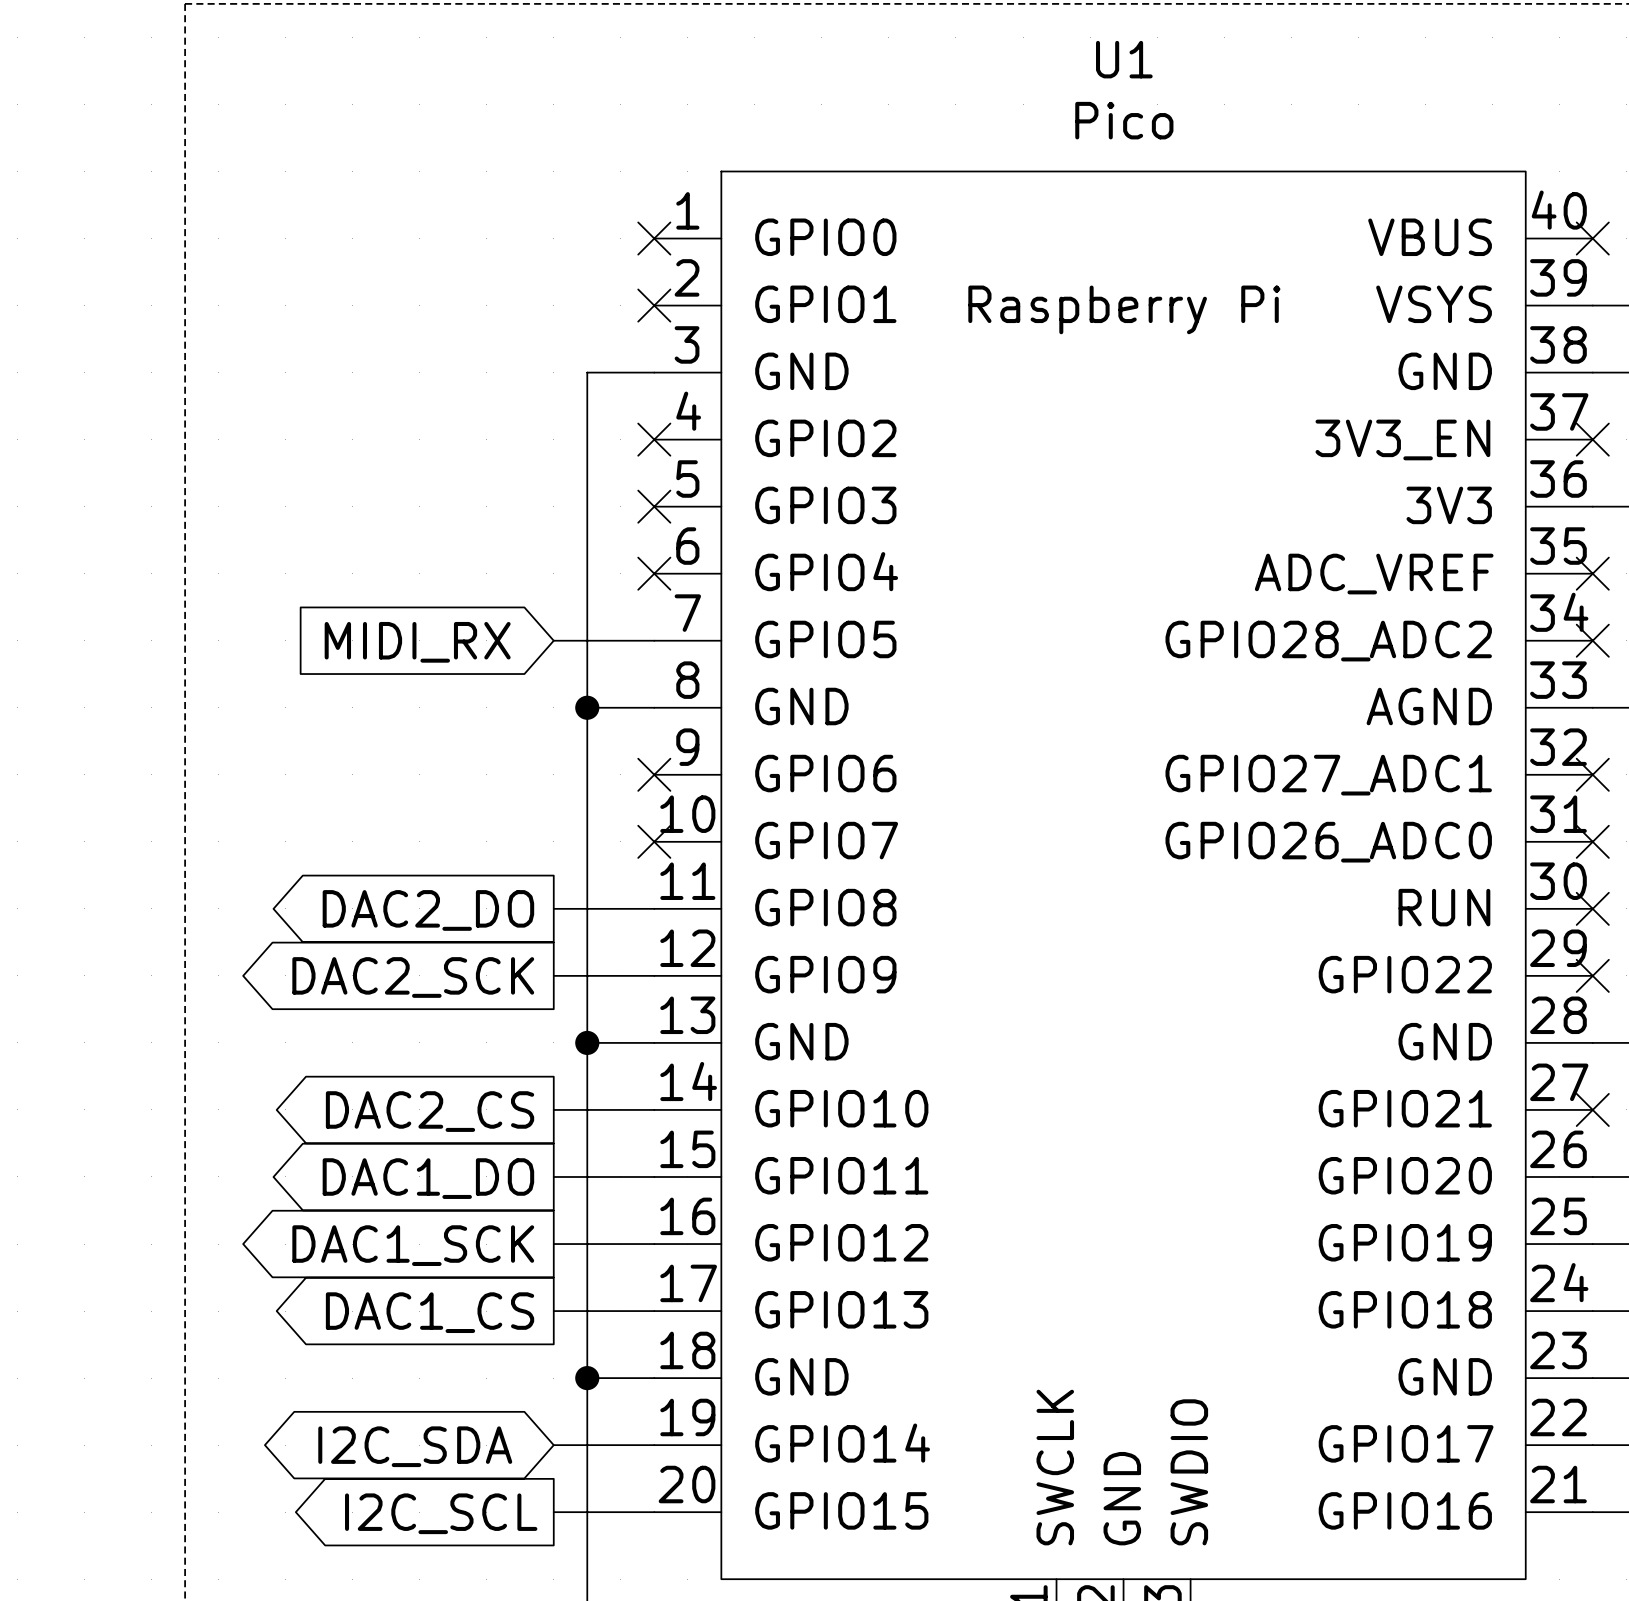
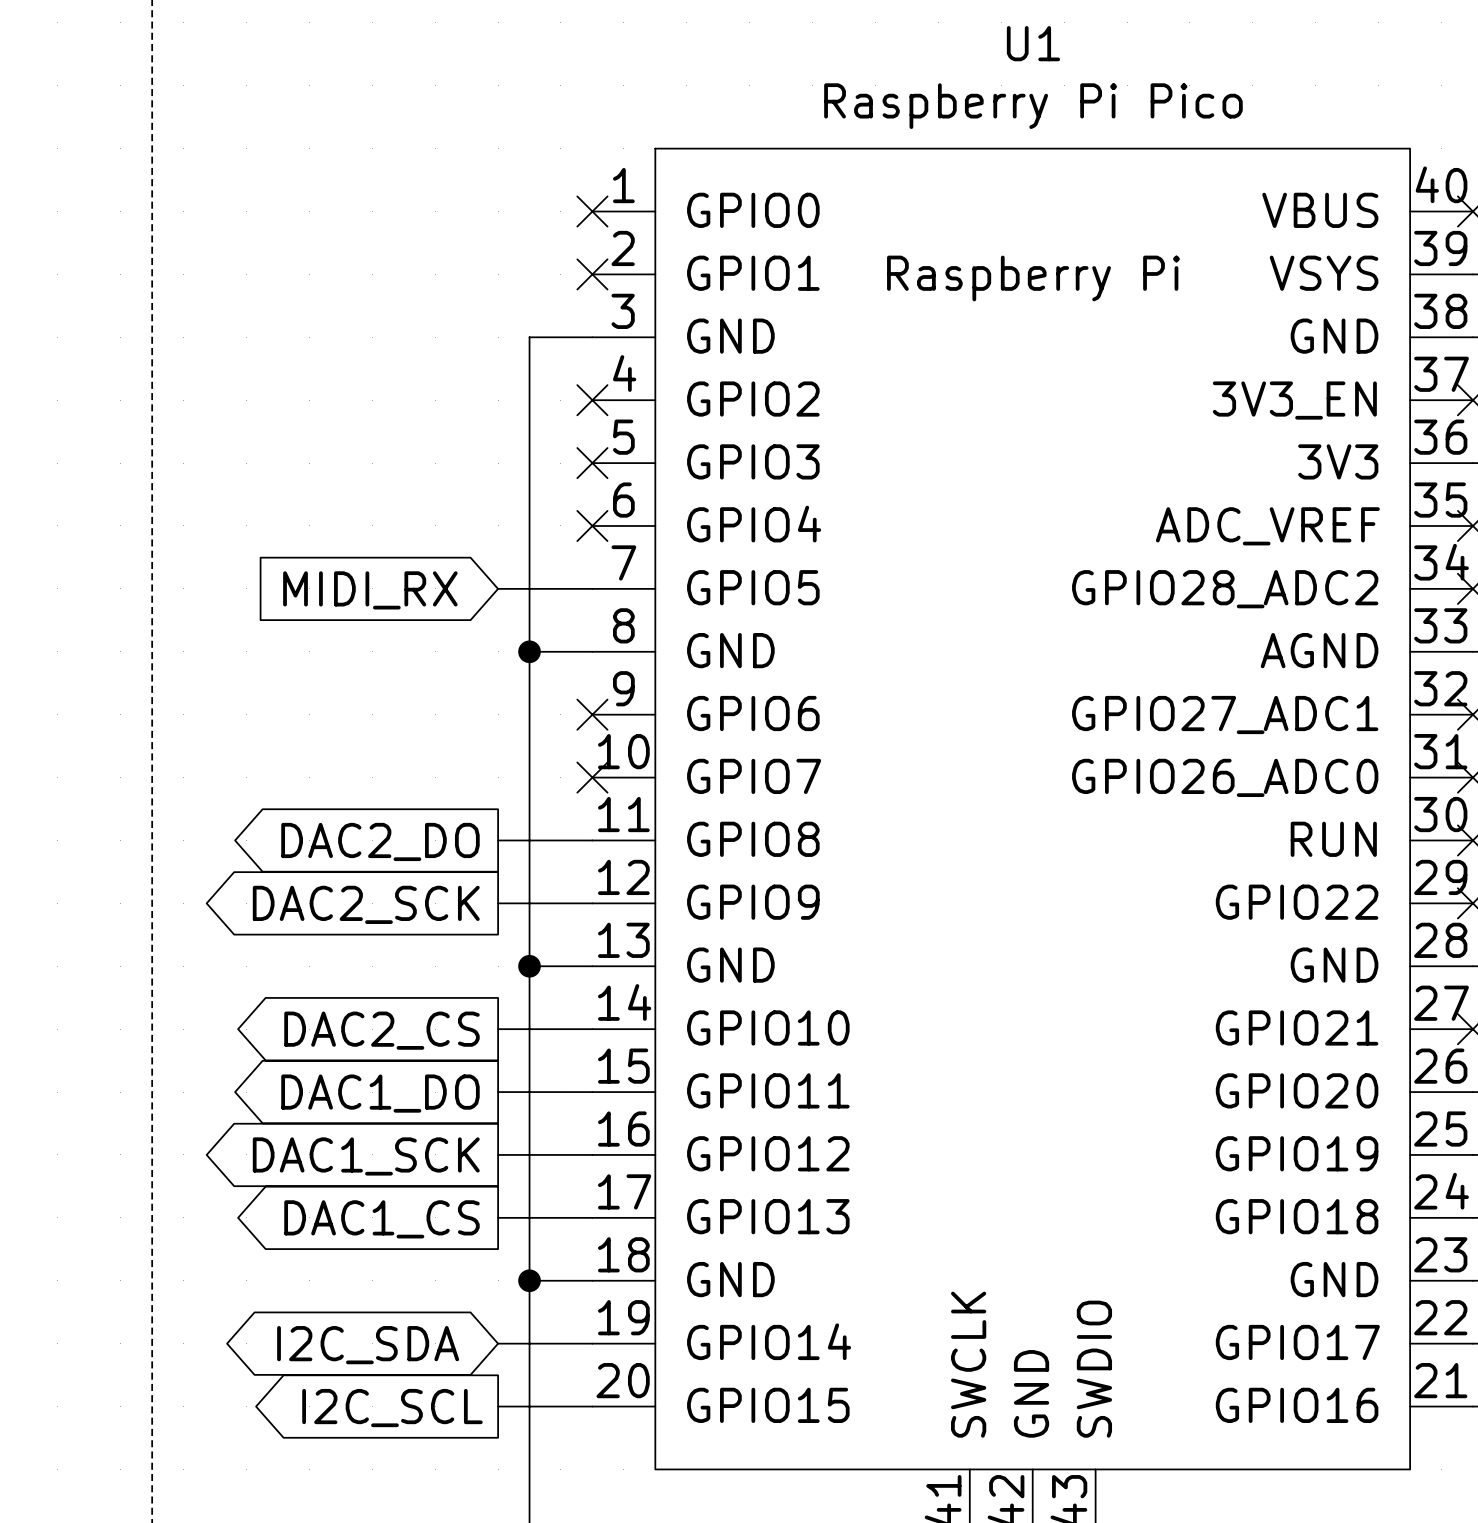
U1 value: Pico (1124, 120) -> Raspberry Pi Pico (1033, 106)

